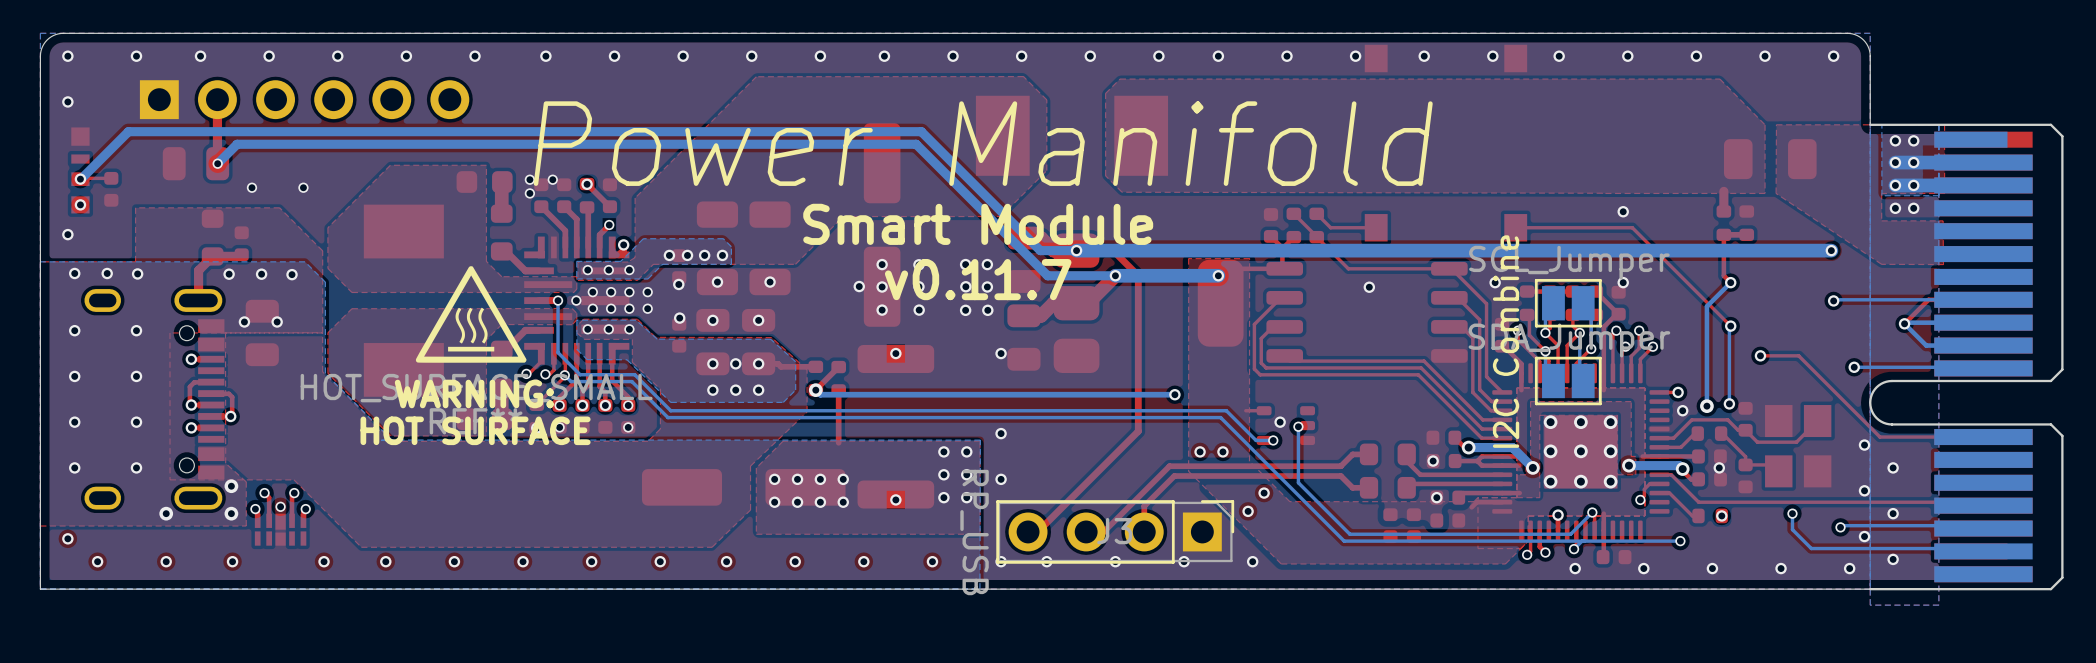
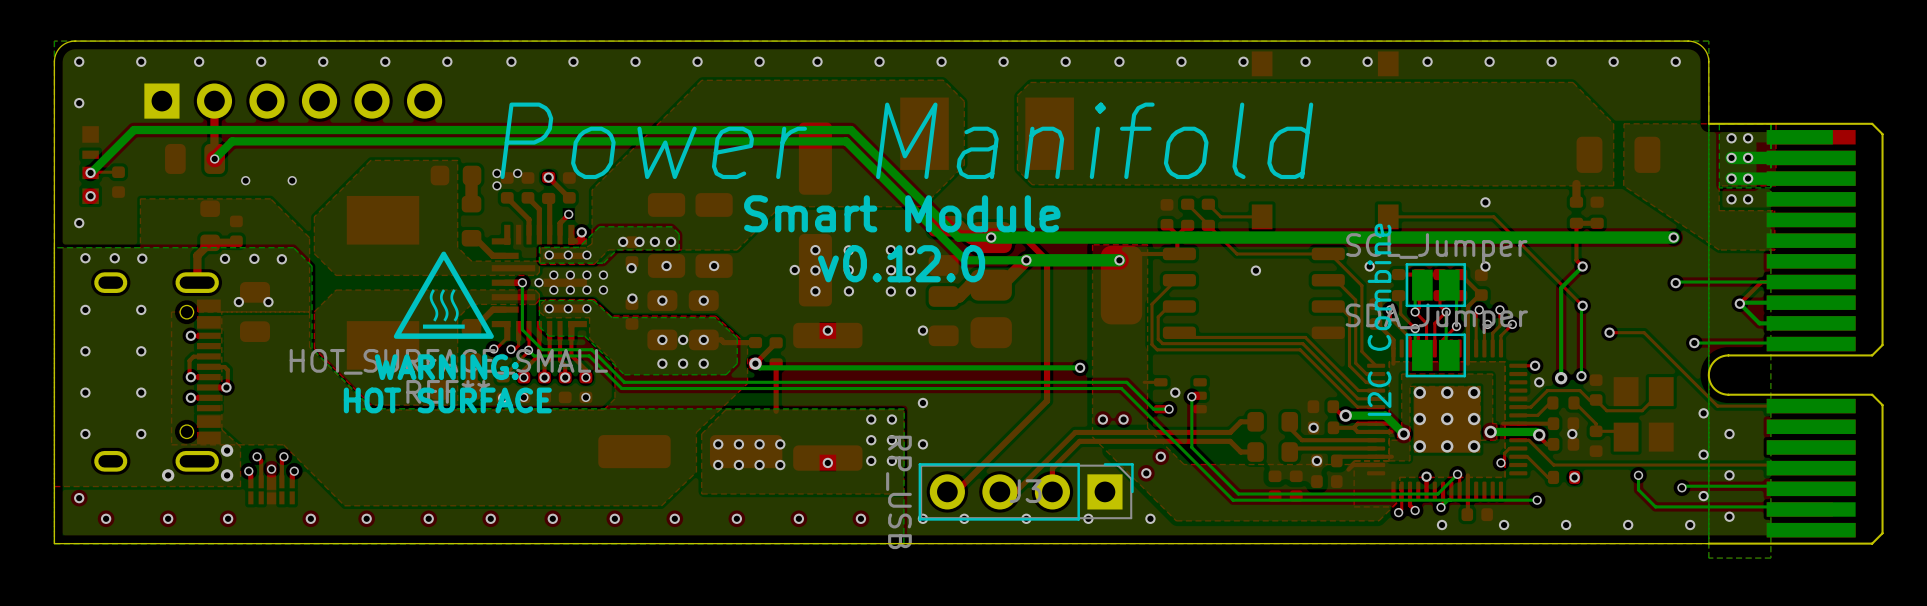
text: v0.11.7 (978, 279) -> v0.12.0 (901, 263)

